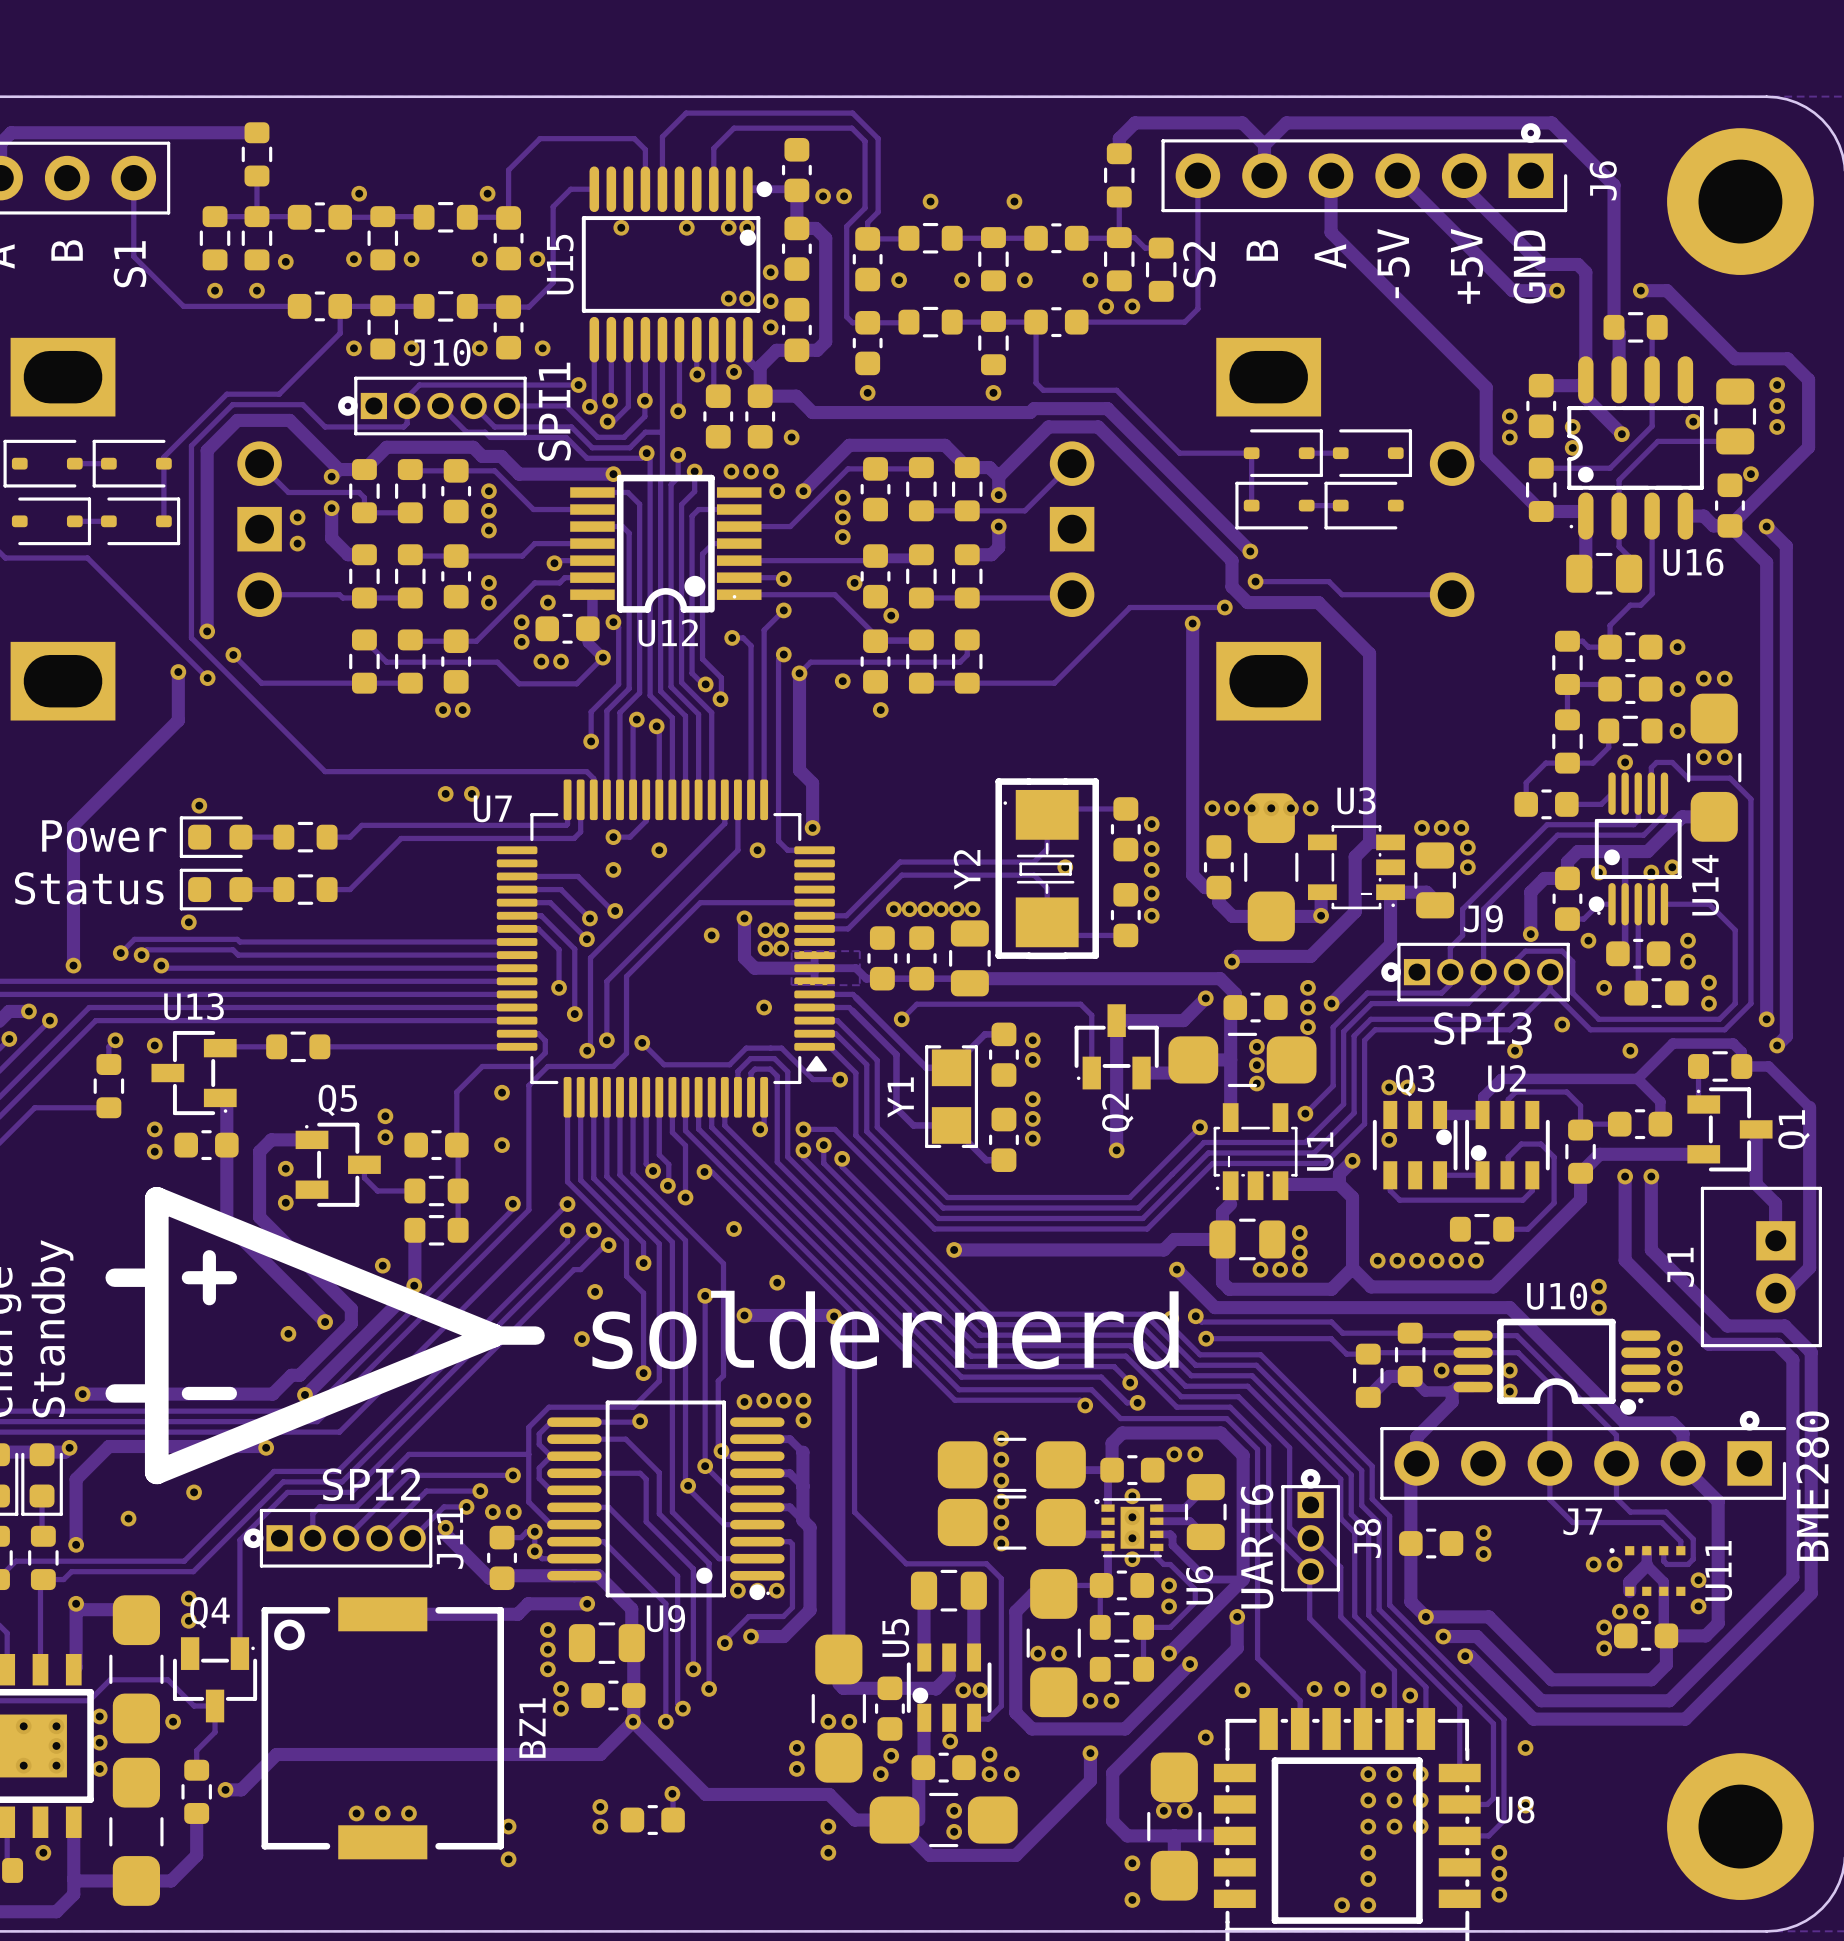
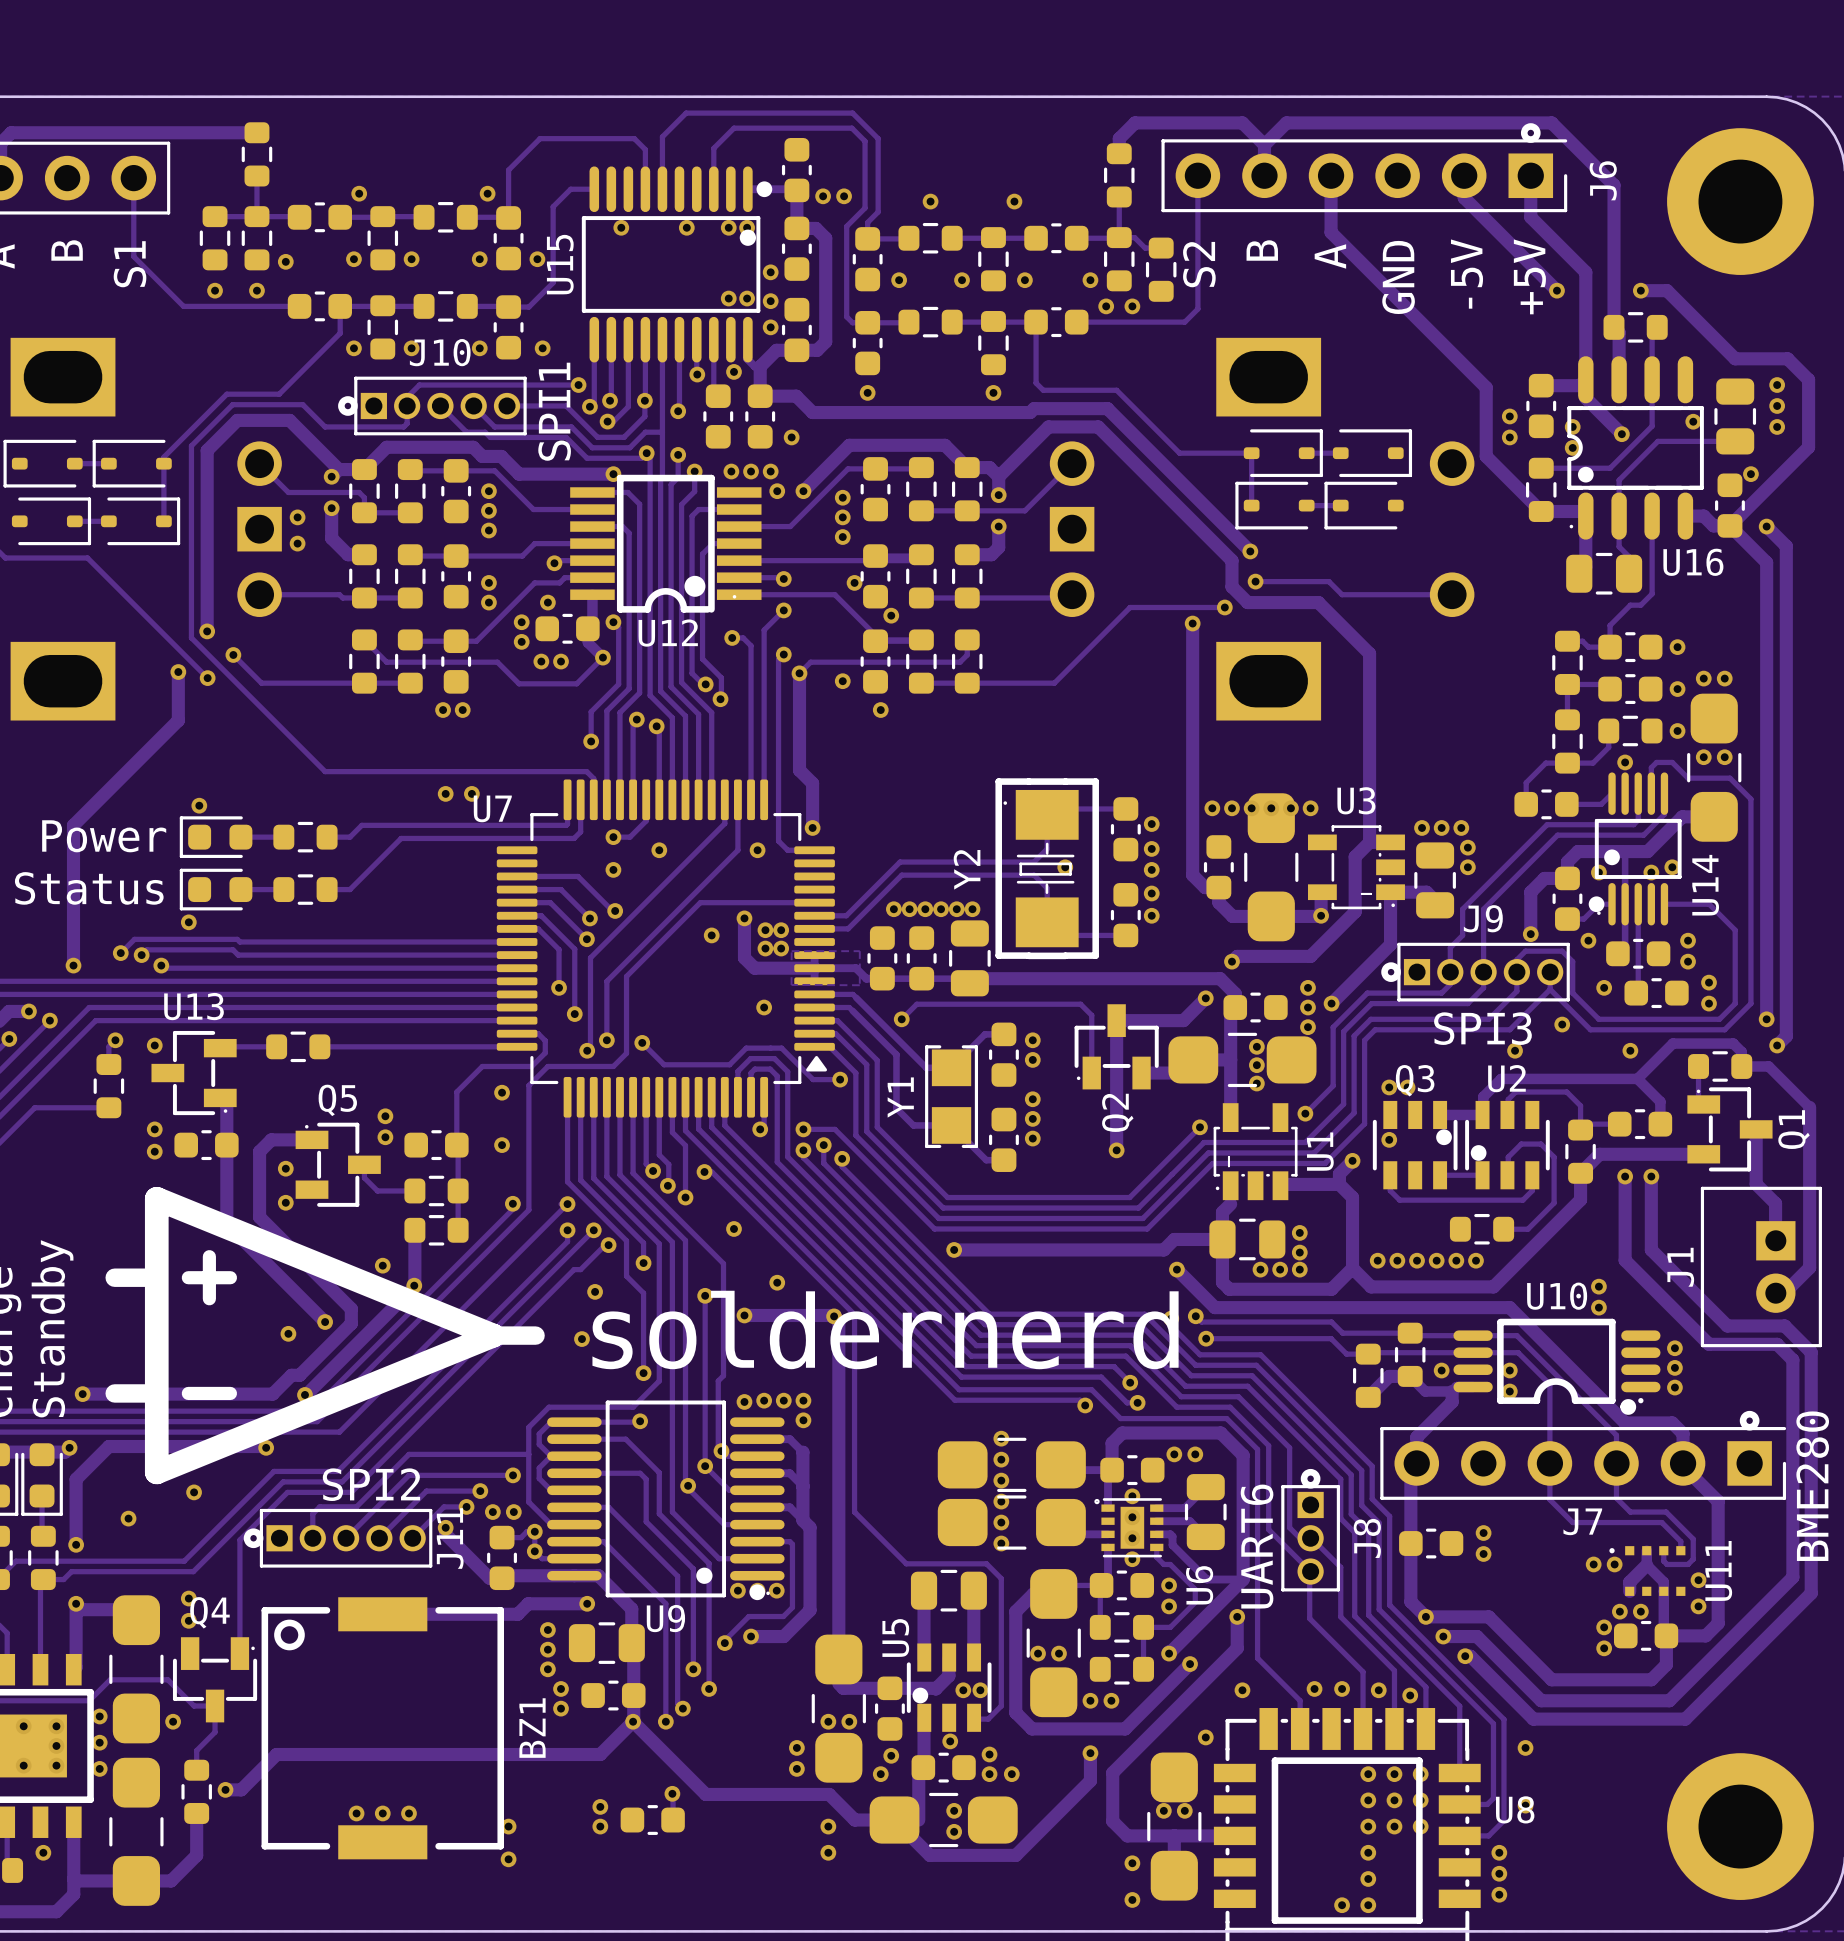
track: (1397, 175) (1512, 290) (1556, 290) -> none
track: none -> (1530, 175) (1530, 217) (1577, 264)
track: (1464, 187) (1541, 264) (1577, 264) -> (1464, 187) (1464, 197) (1556, 290)
text: -5V (1393, 263) -> GND (1398, 277)
text: +5V (1467, 266) -> -5V (1467, 274)
text: GND (1529, 266) -> +5V (1529, 276)

